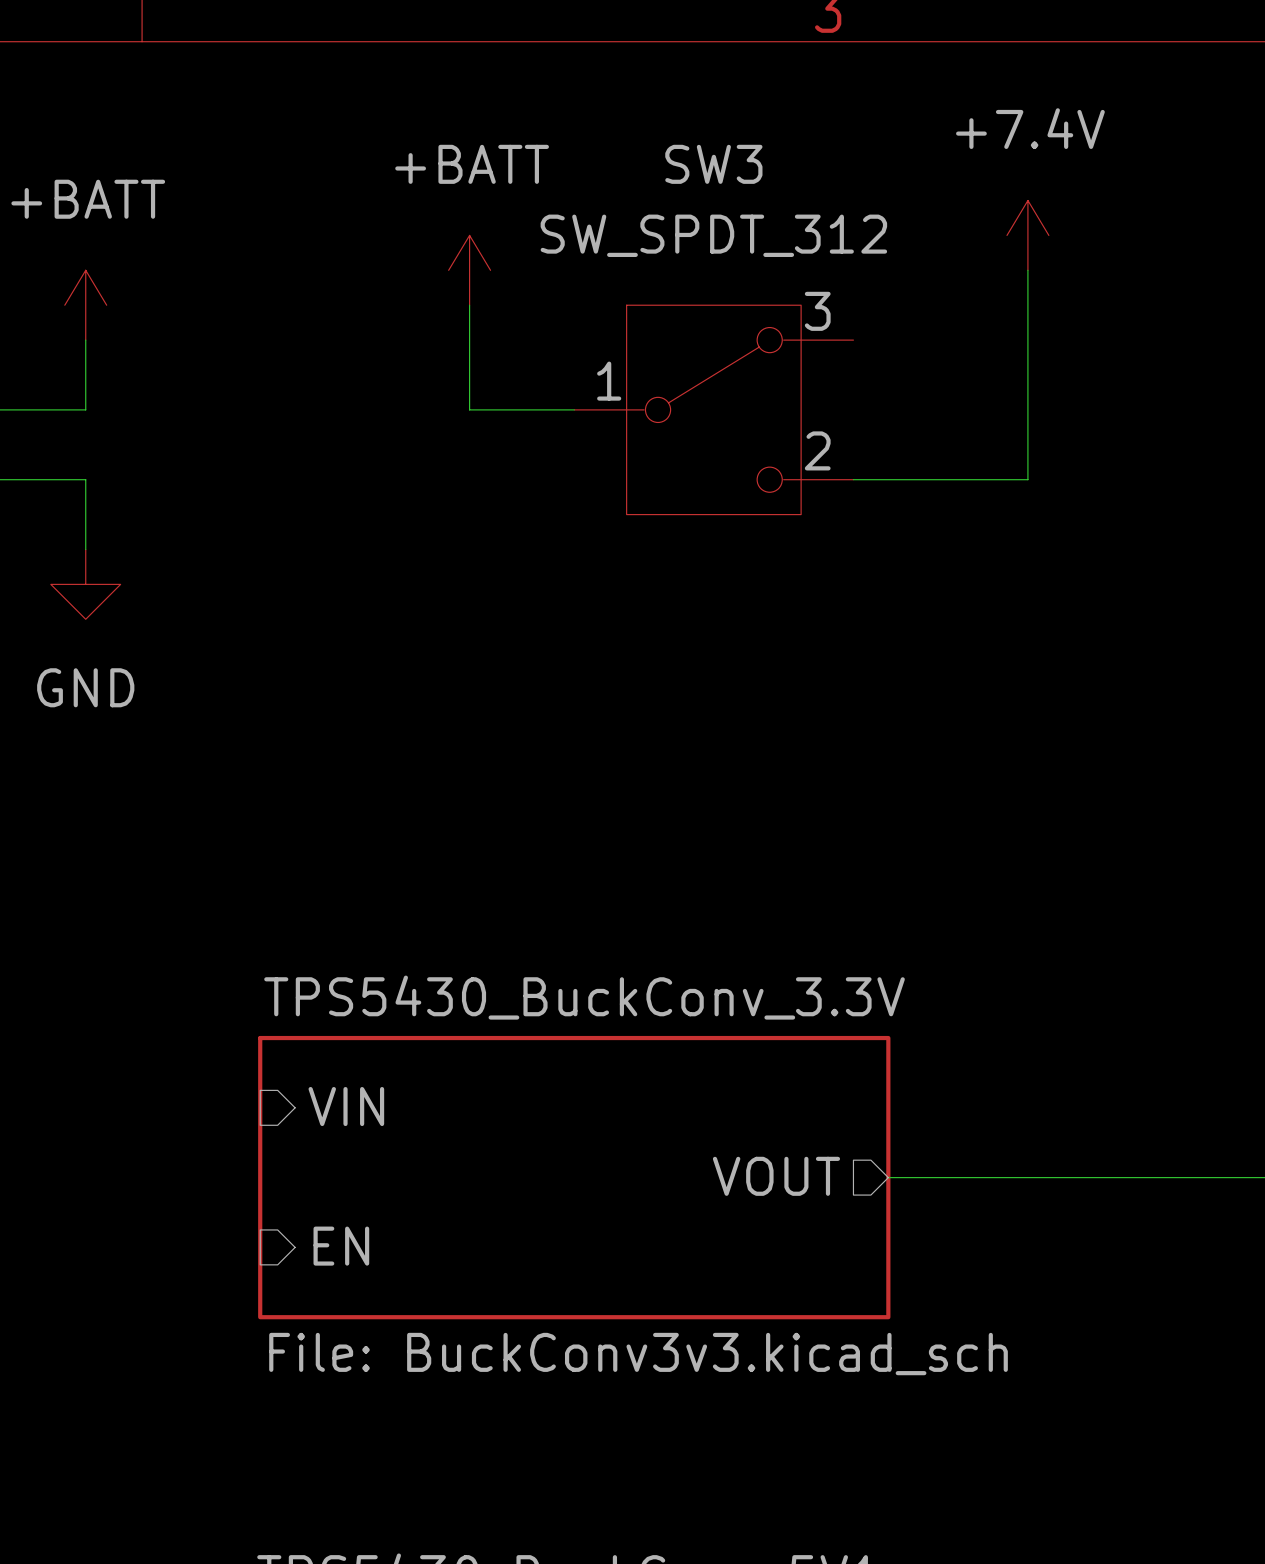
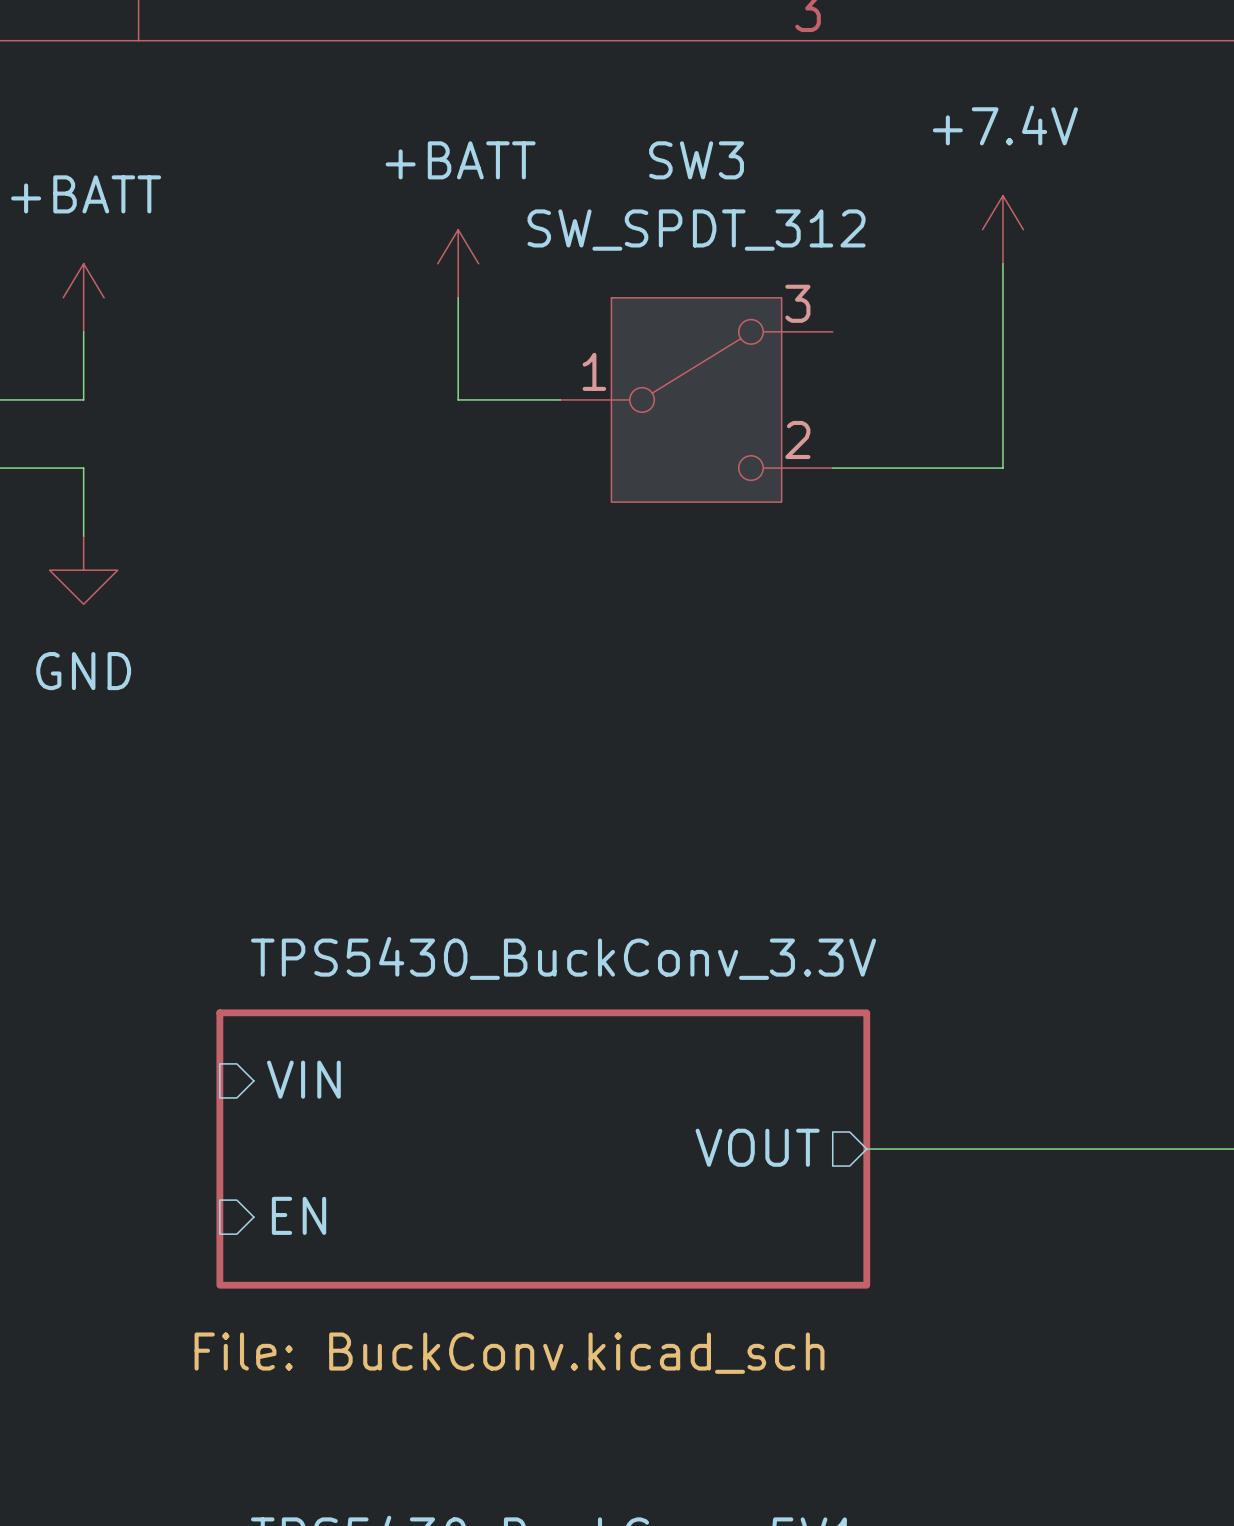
sheet TPS5430_BuckConv_3.3V shape: [258, 1035, 891, 1320] -> [216, 1009, 871, 1289]
sheet pin position: VIN (346, 1106) -> VIN (303, 1079)
sheet pin position: EN (341, 1246) -> EN (299, 1215)
sheet TPS5430_BuckConv_3.3V value: File: BuckConv3v3.kicad_sch (638, 1354) -> File: BuckConv.kicad_sch (509, 1353)

